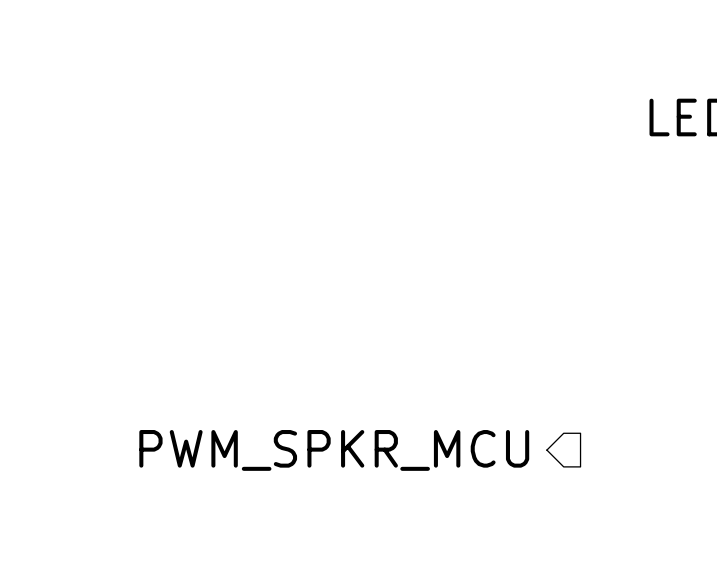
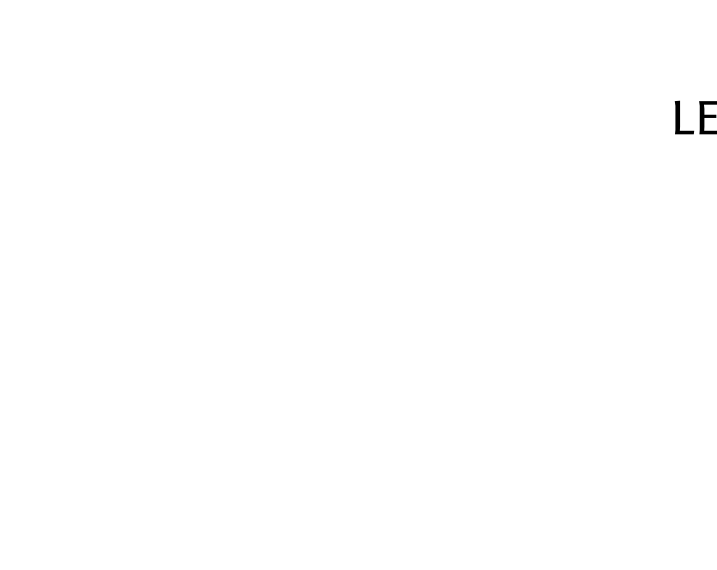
hierarchical label: PWM_SPKR_MCU (334, 450) -> none

